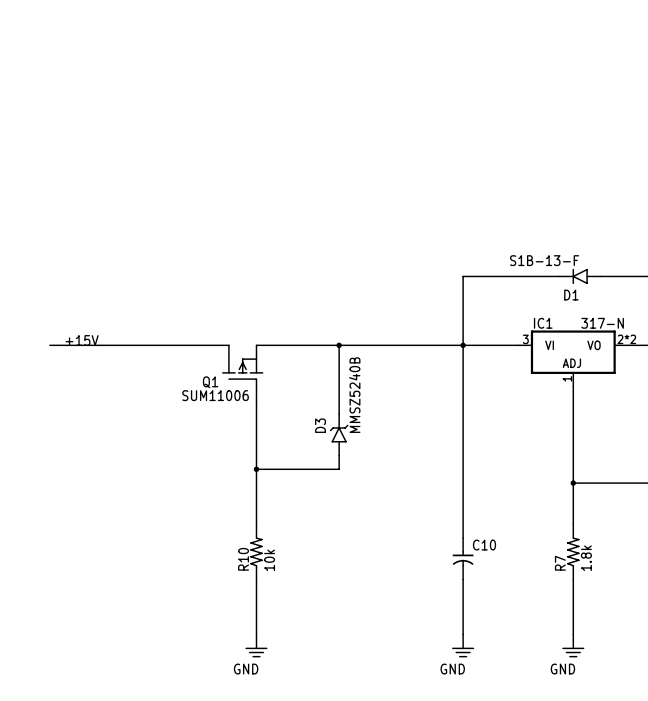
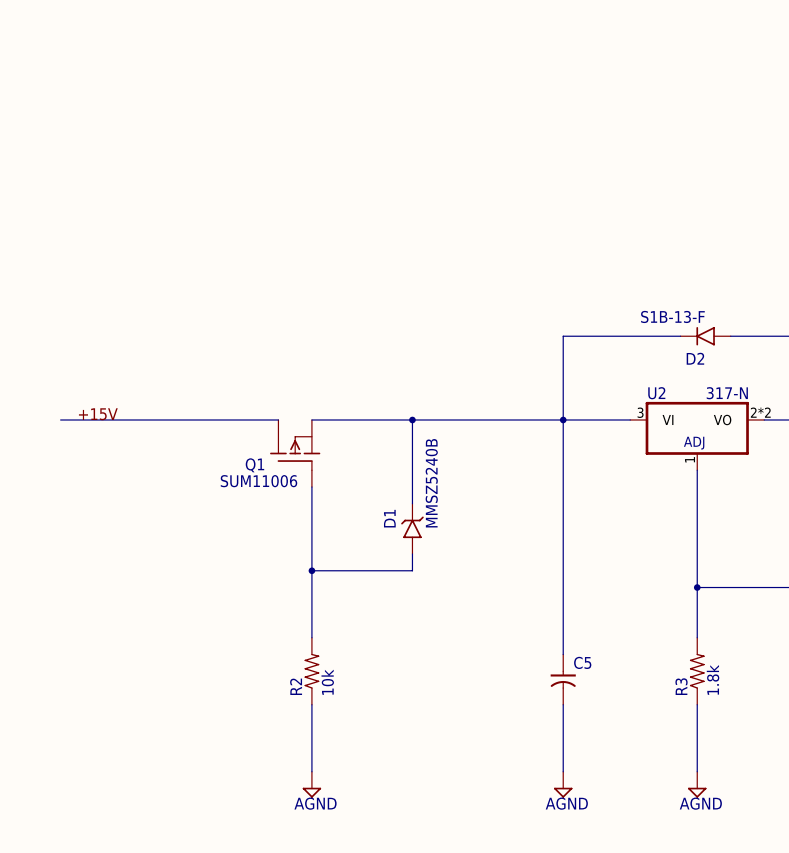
D1 name: D1 (571, 295) -> D2 (695, 358)
IC1 name: IC1 (543, 323) -> U2 (656, 393)
D3 name: D3 (320, 425) -> D1 (389, 518)
C10 name: C10 (484, 545) -> C5 (582, 662)
R10 name: R10 (243, 559) -> R2 (296, 686)
R7 name: R7 (560, 563) -> R3 (681, 686)
power symbol: GND (256, 645) -> AGND (311, 784)
power symbol: GND (463, 645) -> AGND (563, 784)
power symbol: GND (573, 645) -> AGND (697, 784)

